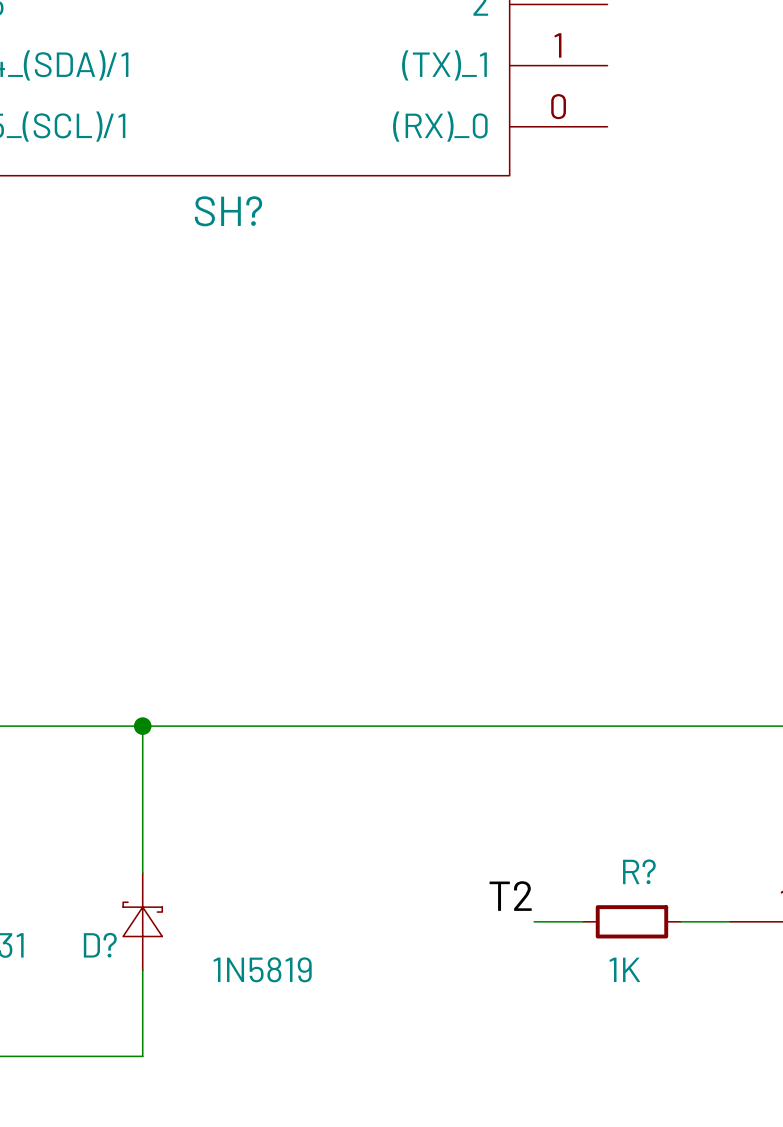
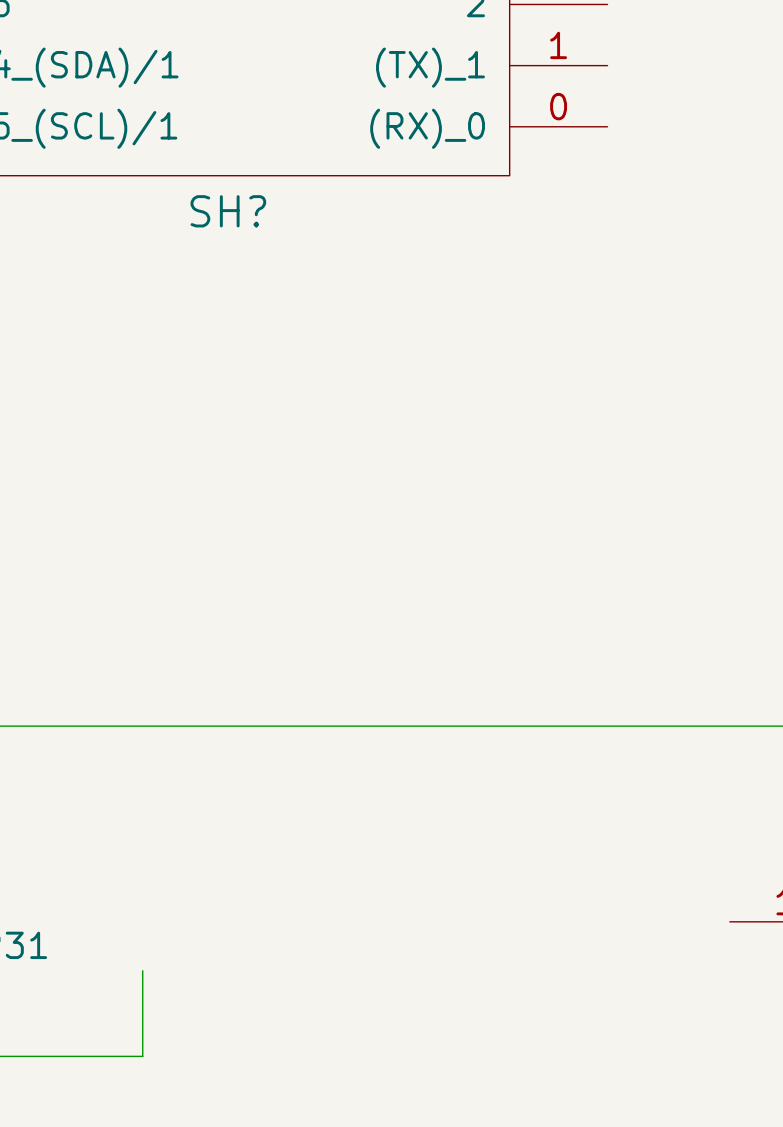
wire: (142, 726) (142, 872) -> none
junction: (142, 726) -> none
label: T2 (510, 896) -> none
D?: 1N5819 (142, 921) -> none
wire: (534, 921) (583, 921) -> none
R?: 1K (631, 921) -> none
wire: (680, 921) (729, 921) -> none

